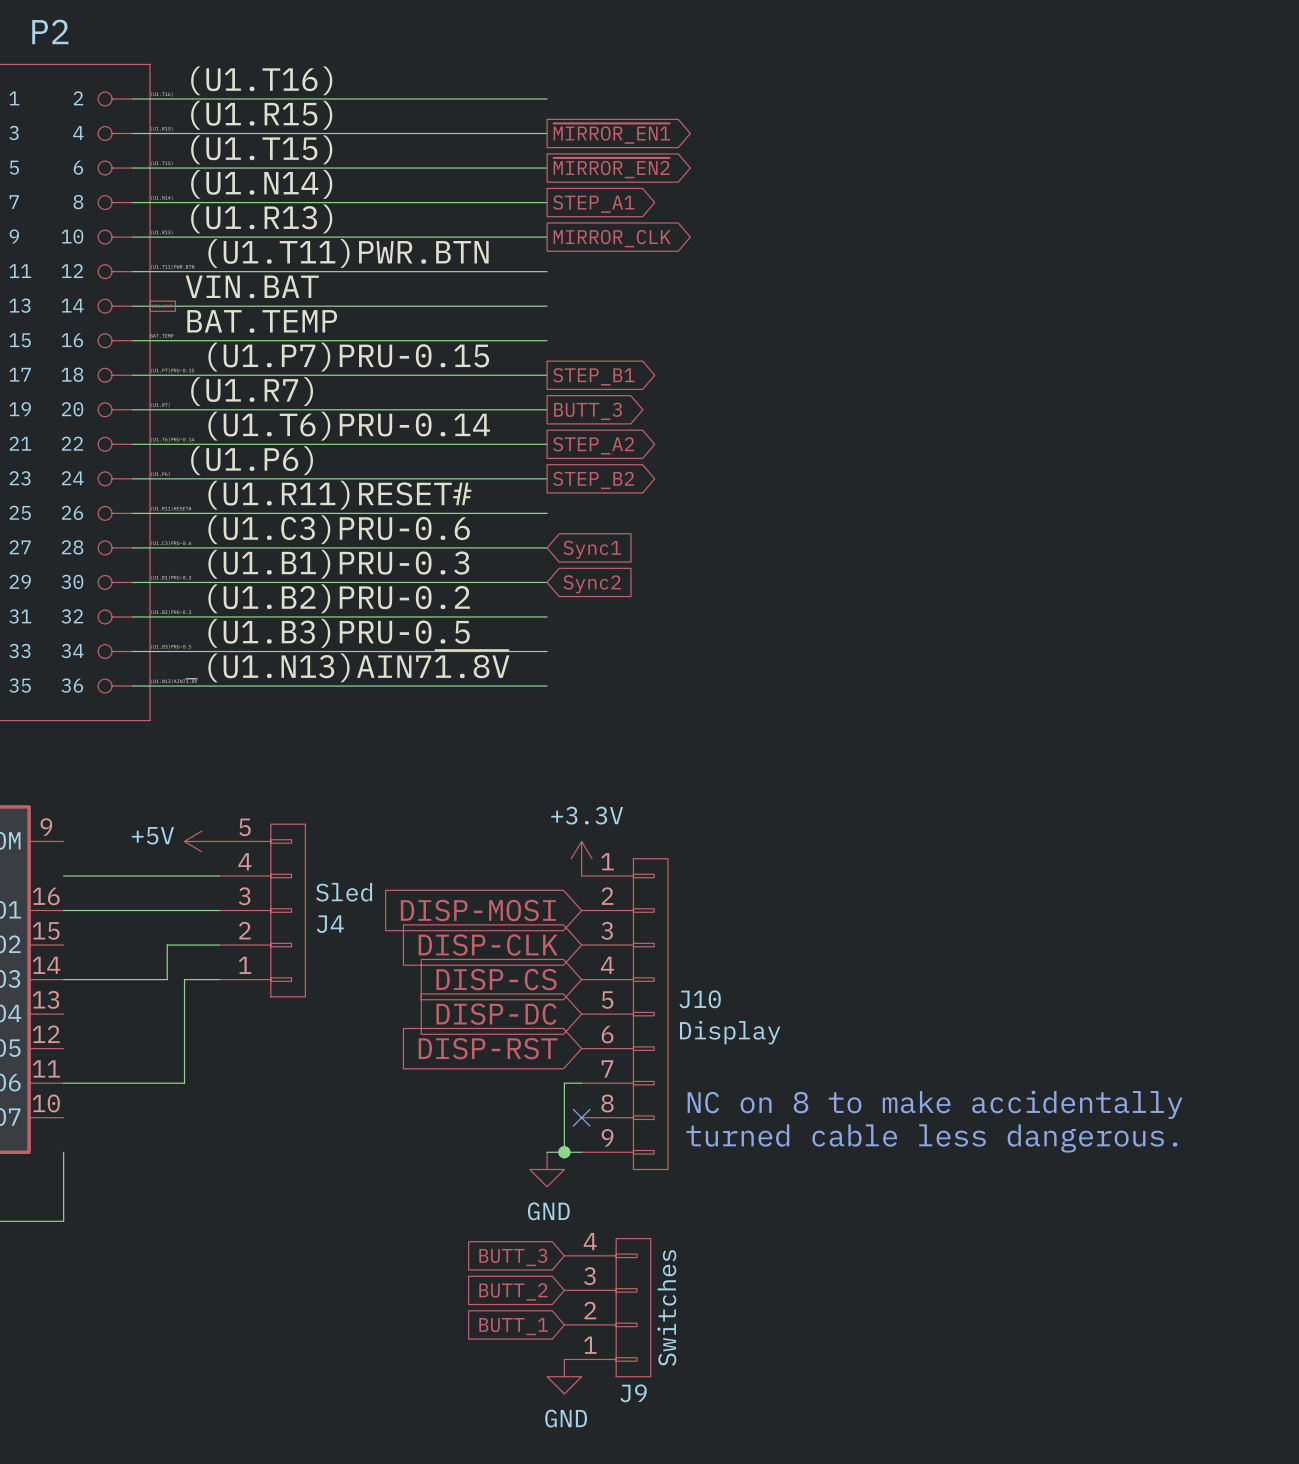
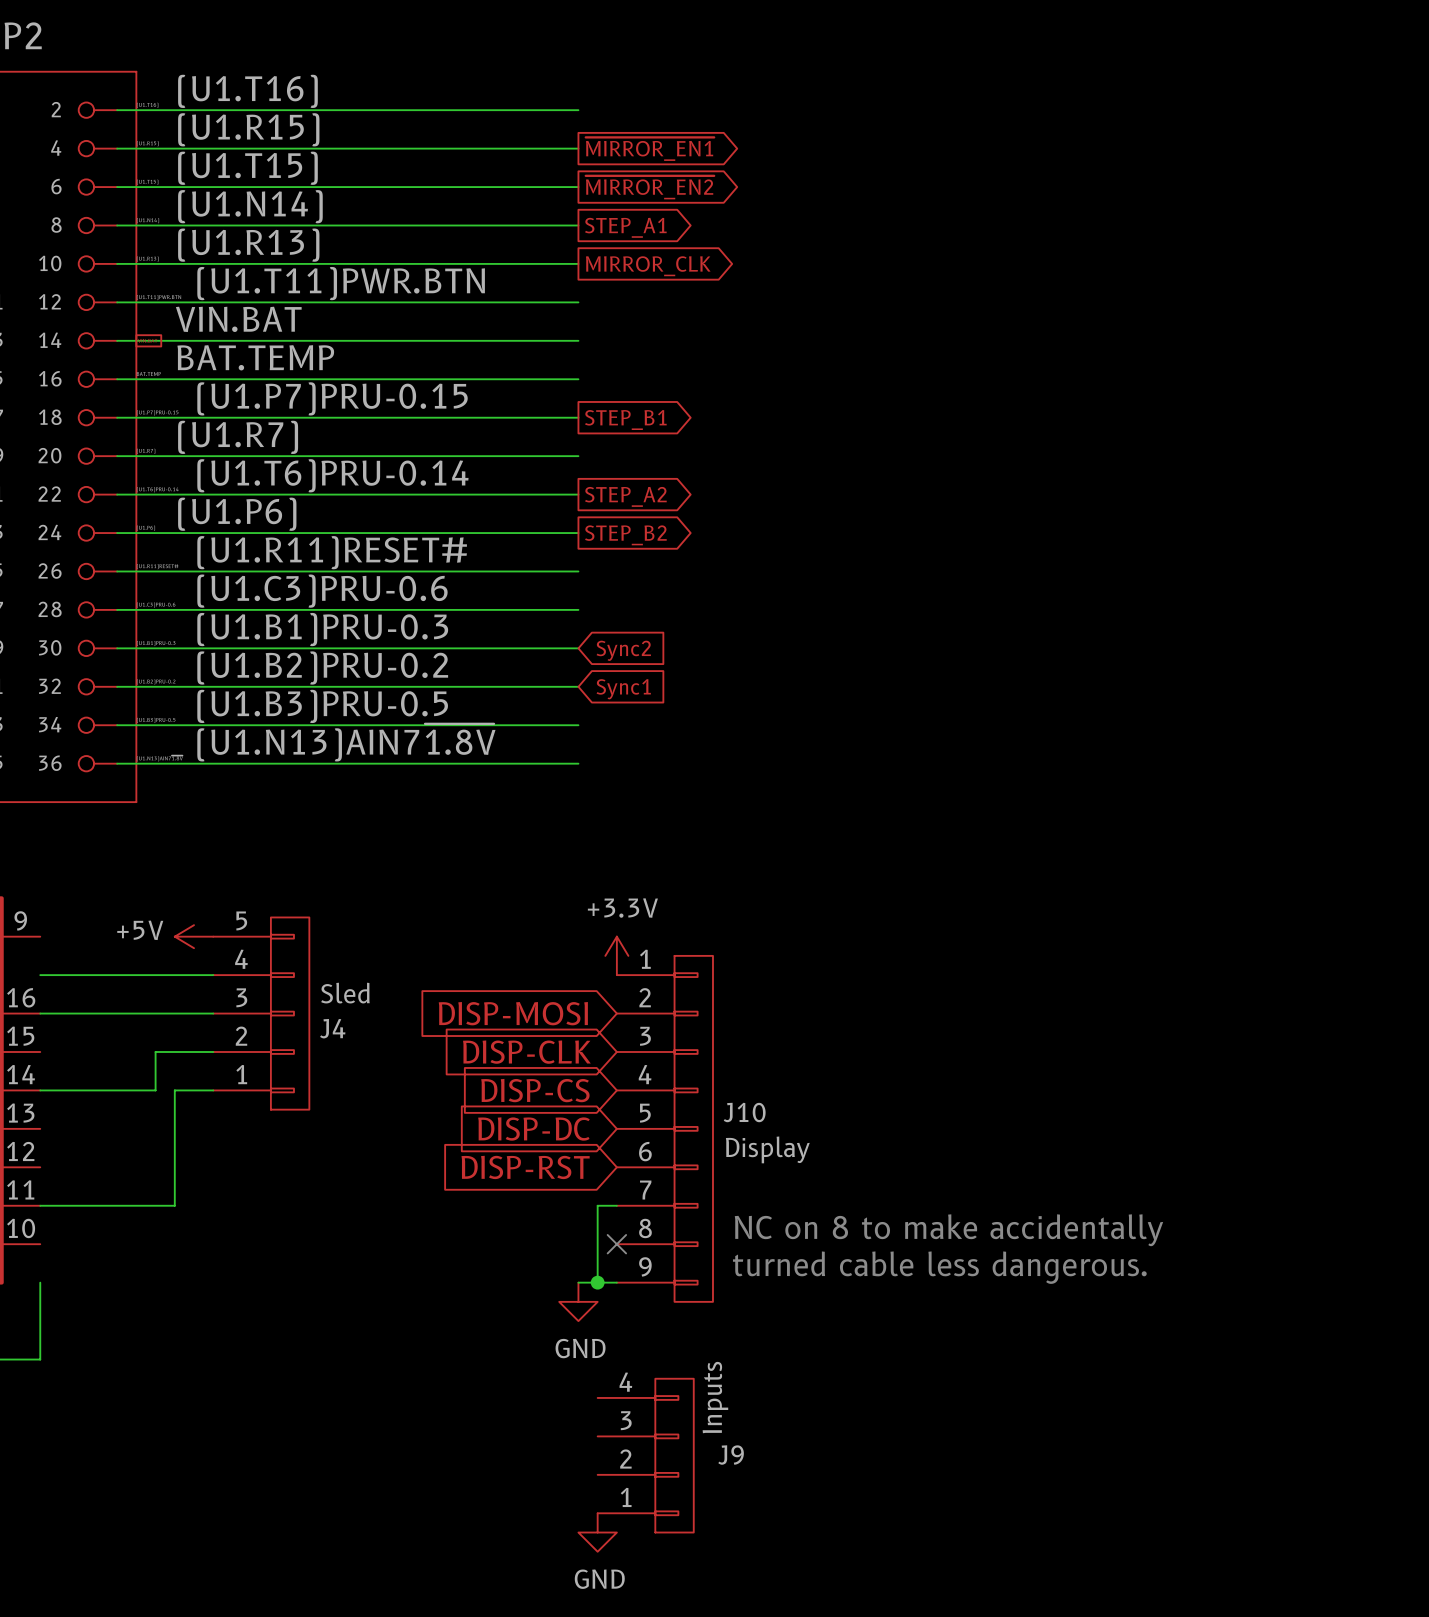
global label: BUTT_3 (587, 411) -> none
global label position: Sync1 (592, 549) -> Sync1 (623, 689)
global label: BUTT_3 (513, 1257) -> none
global label: BUTT_2 (513, 1291) -> none
J9 value: Switches (666, 1308) -> Inputs (715, 1397)
global label: BUTT_1 (513, 1326) -> none
J9 name position: J9 (633, 1393) -> J9 (731, 1455)

